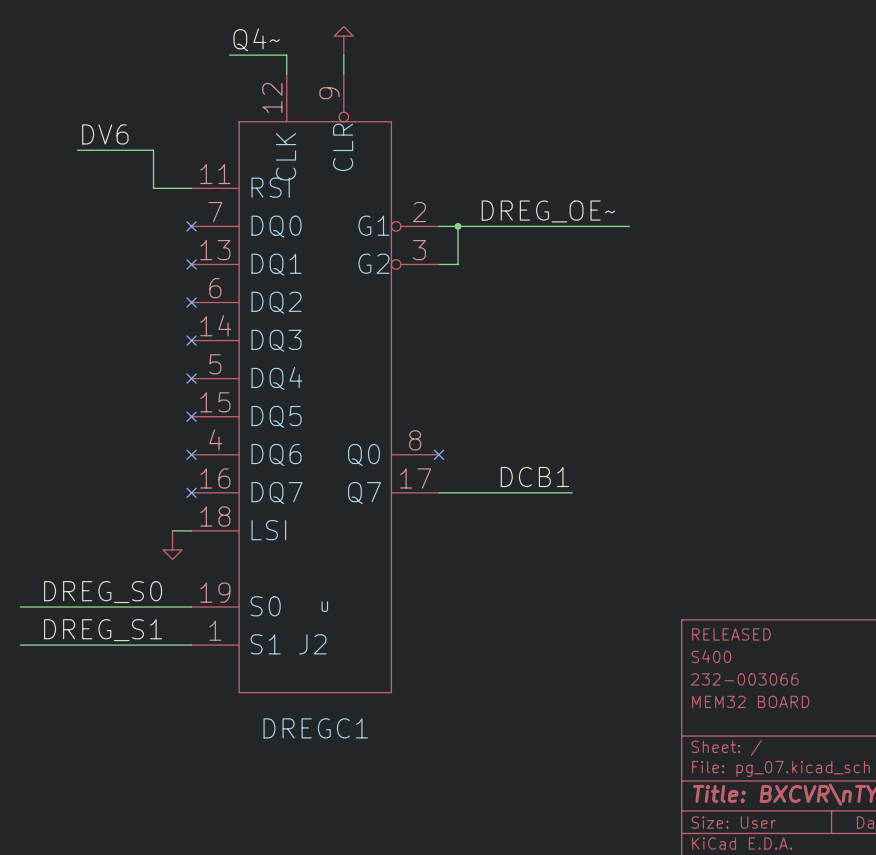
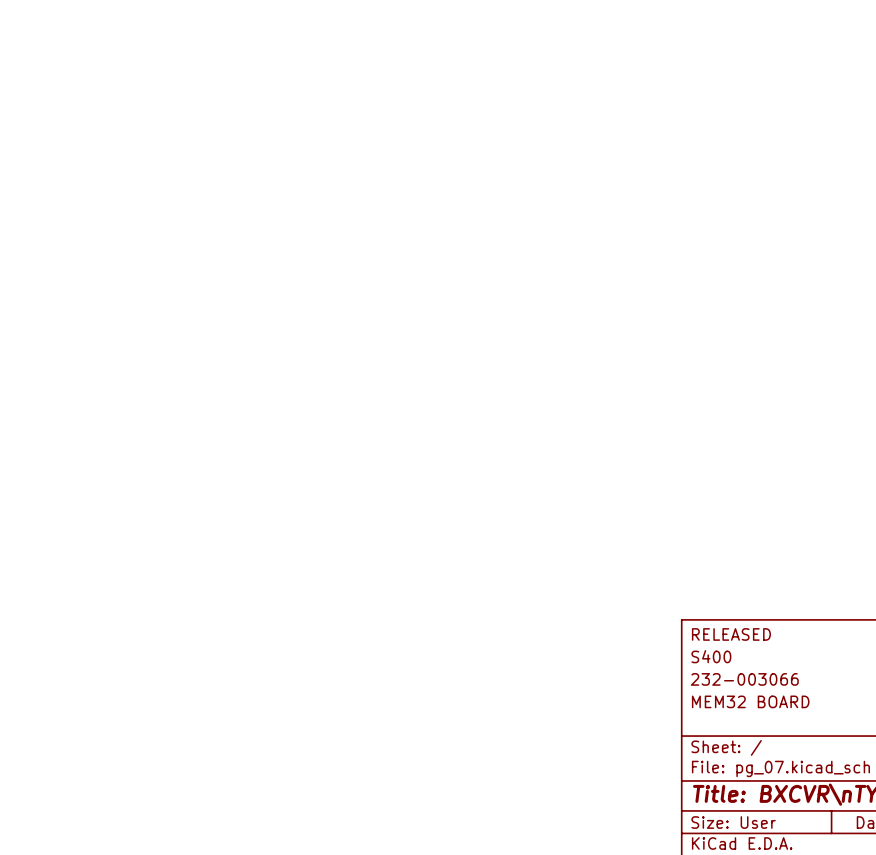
label: Q4~ (256, 39) -> none
power symbol: (343, 40) -> none
wire: (229, 55) (286, 55) (286, 74) -> none
wire: (343, 55) (343, 74) -> none
label: DV6 (105, 134) -> none
wire: (77, 150) (153, 150) (153, 188) (191, 188) -> none
label: DREG_OE~ (548, 211) -> none
no-connect mark: (191, 226) -> none
wire: (438, 226) (629, 226) -> none
wire: (458, 226) (458, 264) (438, 264) -> none
junction: (458, 226) -> none
no-connect mark: (191, 264) -> none
no-connect mark: (191, 302) -> none
no-connect mark: (191, 340) -> none
no-connect mark: (191, 378) -> none
U: (315, 383) -> none
no-connect mark: (191, 416) -> none
no-connect mark: (191, 454) -> none
no-connect mark: (438, 454) -> none
label: DCB1 (534, 476) -> none
no-connect mark: (191, 492) -> none
wire: (438, 492) (572, 492) -> none
wire: (172, 530) (191, 530) -> none
power symbol: (172, 545) -> none
label: DREG_S0 (103, 592) -> none
wire: (20, 607) (191, 607) -> none
label: DREG_S1 (103, 630) -> none
wire: (20, 645) (191, 645) -> none

